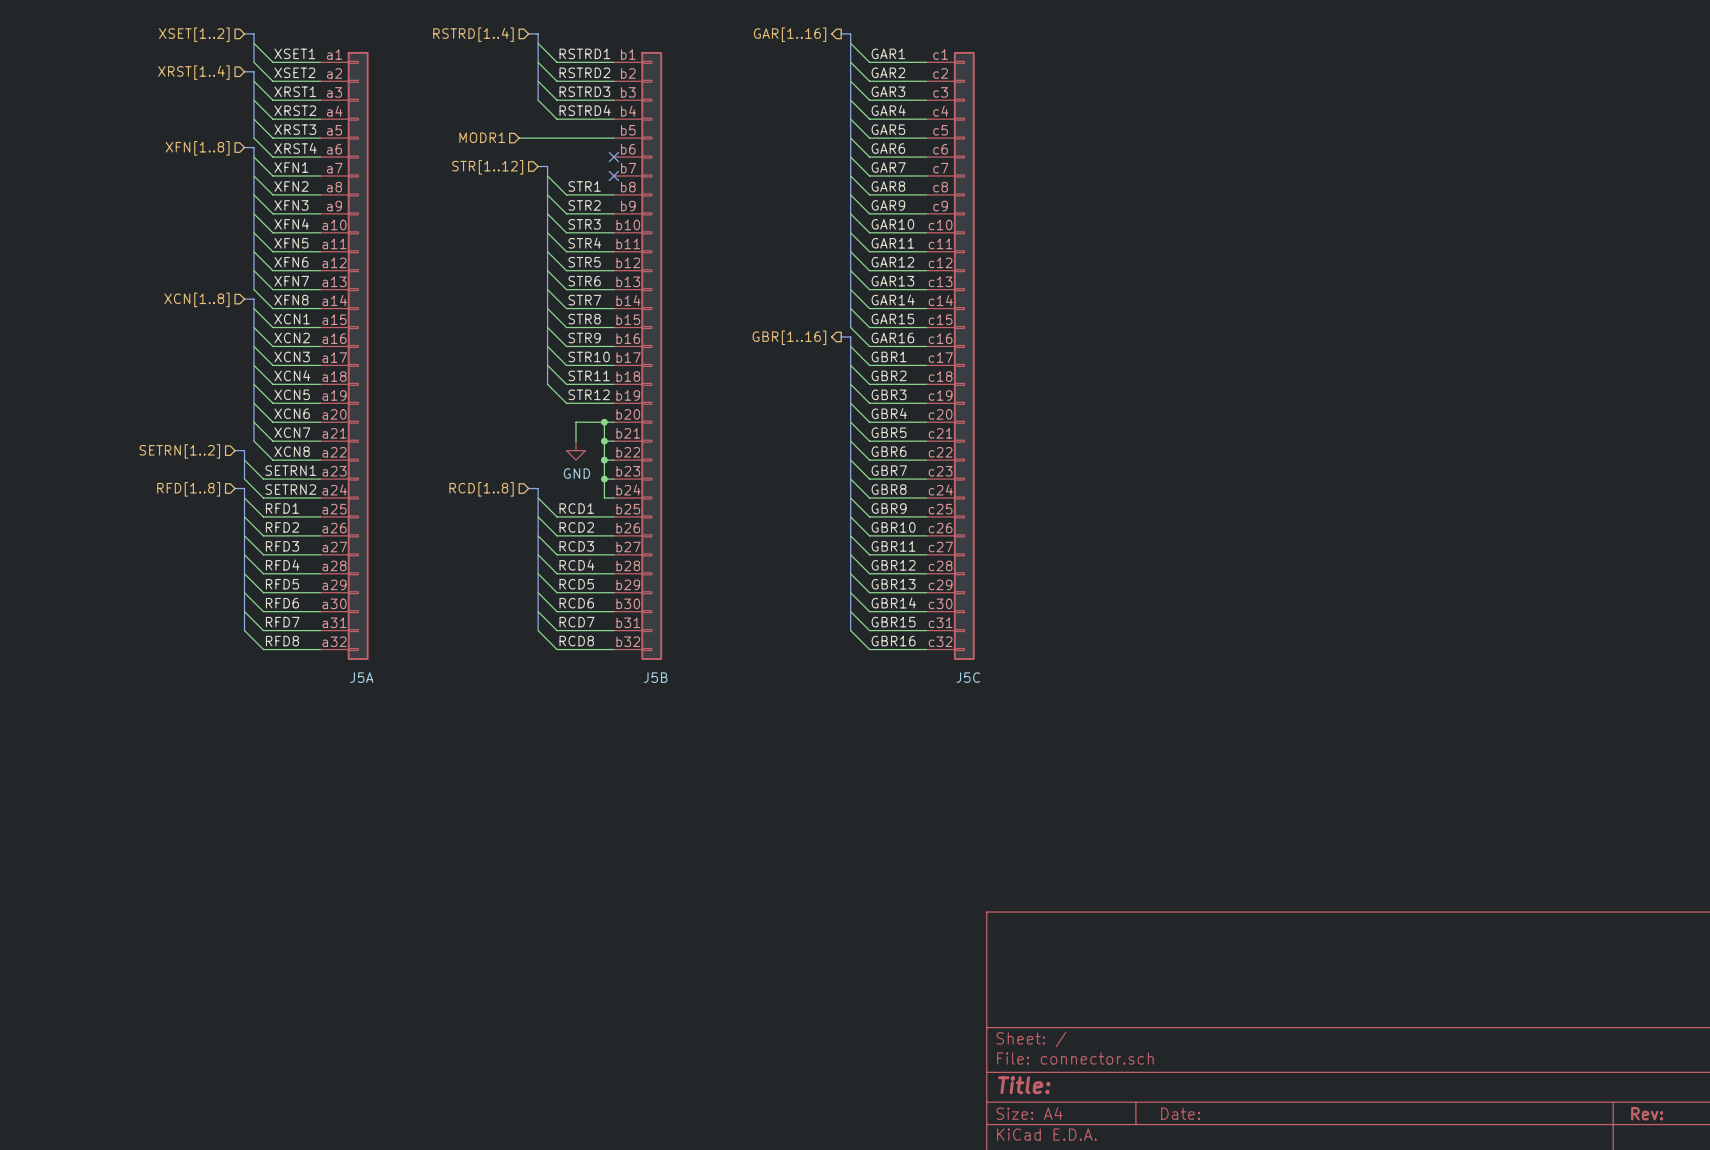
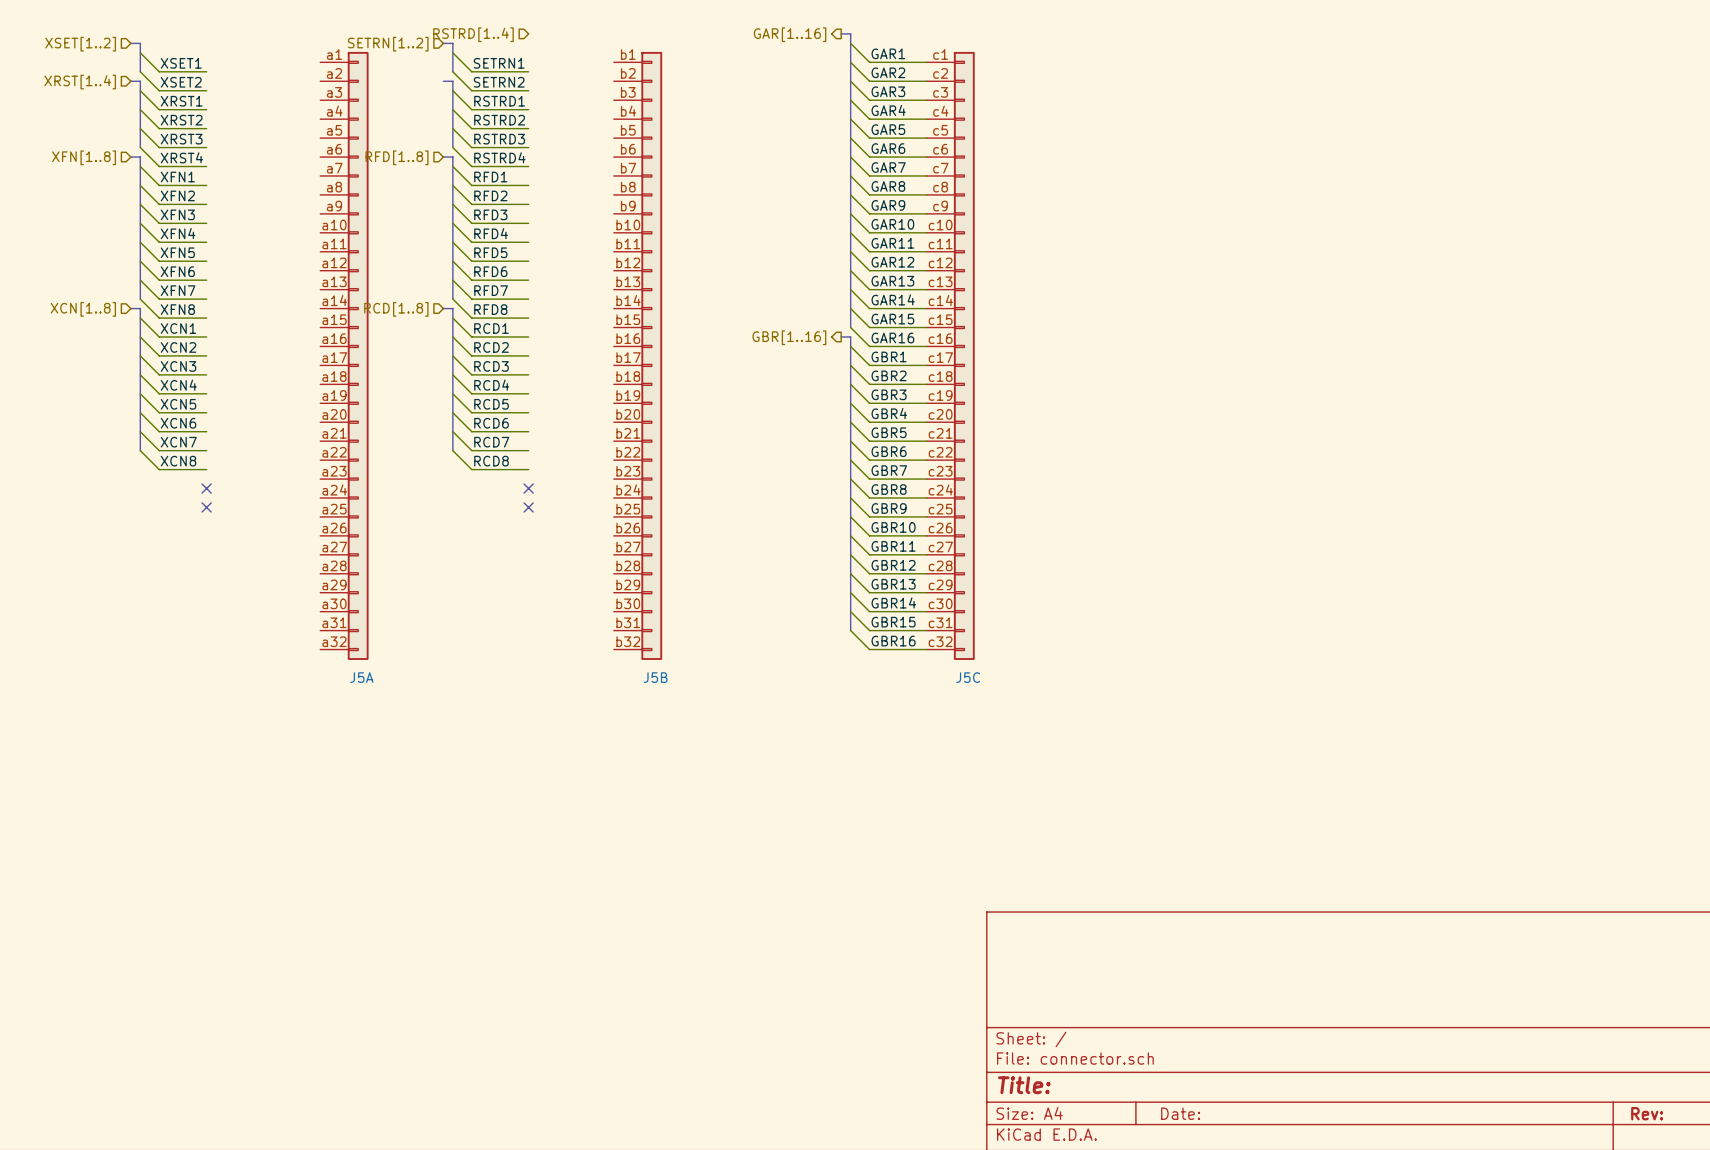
bus: (244, 33) (253, 33) (253, 62) -> (130, 43) (140, 43) (140, 71)
bus: (528, 33) (538, 33) (538, 100) -> (443, 81) (452, 81) (452, 147)
hierarchical label position: XSET[1..2] (194, 34) -> XSET[1..2] (80, 44)
wire: (253, 43) (272, 62) (320, 62) -> (140, 52) (159, 71) (206, 71)
bus: none -> (443, 43) (452, 43) (452, 71)
wire: (538, 43) (557, 62) (613, 62) -> (452, 52) (471, 71) (528, 71)
hierarchical label: none -> SETRN[1..2] (388, 44)
label position: XSET1 (294, 53) -> XSET1 (181, 63)
label position: RSTRD1 (584, 53) -> RSTRD1 (499, 101)
wire: (253, 62) (272, 81) (320, 81) -> (140, 71) (159, 90) (206, 90)
wire: (538, 62) (557, 81) (613, 81) -> (452, 71) (471, 90) (528, 90)
label: none -> SETRN1 (499, 63)
bus: (244, 71) (253, 71) (253, 138) -> (130, 81) (140, 81) (140, 147)
hierarchical label position: XRST[1..4] (193, 72) -> XRST[1..4] (80, 82)
label position: XSET2 (294, 72) -> XSET2 (181, 82)
label position: RSTRD2 (584, 72) -> RSTRD2 (499, 120)
wire: (253, 81) (272, 100) (320, 100) -> (140, 90) (159, 109) (206, 109)
wire: (538, 81) (557, 100) (613, 100) -> (452, 90) (471, 109) (528, 109)
label: none -> SETRN2 (499, 82)
label position: XRST1 (295, 91) -> XRST1 (181, 101)
label position: RSTRD3 (584, 91) -> RSTRD3 (499, 139)
wire: (253, 100) (272, 119) (320, 119) -> (140, 109) (159, 128) (206, 128)
wire: (538, 100) (557, 119) (613, 119) -> (452, 109) (471, 128) (528, 128)
label position: XRST2 (295, 110) -> XRST2 (181, 120)
label position: RSTRD4 (585, 110) -> RSTRD4 (499, 157)
wire: (253, 119) (272, 138) (320, 138) -> (140, 128) (159, 147) (206, 147)
wire: none -> (452, 128) (471, 147) (528, 147)
label position: XRST3 (295, 129) -> XRST3 (181, 139)
hierarchical label: MODR1 (482, 137) -> none
wire: (253, 138) (272, 157) (320, 157) -> (140, 147) (159, 166) (206, 166)
wire: (519, 138) (613, 138) -> none
bus: (244, 147) (253, 147) (253, 289) -> (130, 157) (140, 157) (140, 299)
wire: none -> (452, 147) (471, 166) (528, 166)
hierarchical label position: XFN[1..8] (197, 148) -> XFN[1..8] (84, 157)
label position: XRST4 (295, 148) -> XRST4 (181, 157)
wire: (253, 157) (272, 175) (320, 175) -> (140, 166) (159, 185) (206, 185)
bus: none -> (443, 157) (452, 157) (452, 299)
no-connect mark: (613, 157) -> none
wire: none -> (452, 166) (471, 185) (528, 185)
bus: (538, 166) (547, 166) (547, 384) -> none
label position: XFN1 (291, 167) -> XFN1 (177, 177)
hierarchical label: STR[1..12] (487, 167) -> RFD[1..8] (397, 157)
wire: (253, 175) (272, 194) (320, 194) -> (140, 185) (159, 204) (206, 204)
wire: (547, 175) (566, 194) (613, 194) -> none
no-connect mark: (613, 175) -> none
label: none -> RFD1 (490, 177)
wire: none -> (452, 185) (471, 204) (528, 204)
label position: XFN2 (291, 186) -> XFN2 (177, 195)
label: STR1 (584, 186) -> none
wire: (253, 194) (272, 213) (320, 213) -> (140, 204) (159, 223) (206, 223)
wire: (547, 194) (566, 213) (613, 213) -> none
label: none -> RFD2 (490, 195)
wire: none -> (452, 204) (471, 223) (528, 223)
label position: XFN3 (291, 205) -> XFN3 (177, 214)
label: STR2 (584, 205) -> none
wire: (253, 213) (272, 232) (320, 232) -> (140, 223) (159, 242) (206, 242)
wire: (547, 213) (566, 232) (613, 232) -> none
label: none -> RFD3 (490, 214)
wire: none -> (452, 223) (471, 242) (528, 242)
label position: XFN4 (291, 224) -> XFN4 (178, 233)
label: STR3 (584, 224) -> none
wire: (253, 232) (272, 251) (320, 251) -> (140, 242) (159, 261) (206, 261)
wire: (547, 232) (566, 251) (613, 251) -> none
label: none -> RFD4 (491, 233)
wire: none -> (452, 242) (471, 261) (528, 261)
label position: XFN5 (291, 243) -> XFN5 (177, 252)
label: STR4 (584, 243) -> none
wire: (253, 251) (272, 270) (320, 270) -> (140, 261) (159, 280) (206, 280)
wire: (547, 251) (566, 270) (613, 270) -> none
label: none -> RFD5 (490, 252)
wire: none -> (452, 261) (471, 280) (528, 280)
label position: XFN6 (291, 262) -> XFN6 (177, 271)
label: STR5 (584, 262) -> none
wire: (253, 270) (272, 289) (320, 289) -> (140, 280) (159, 299) (206, 299)
wire: (547, 270) (566, 289) (613, 289) -> none
label: none -> RFD6 (490, 271)
wire: none -> (452, 280) (471, 299) (528, 299)
label position: XFN7 (291, 281) -> XFN7 (178, 290)
label: STR6 (584, 281) -> none
wire: (253, 289) (272, 308) (320, 308) -> (140, 299) (159, 318) (206, 318)
wire: (547, 289) (566, 308) (613, 308) -> none
label: none -> RFD7 (491, 290)
hierarchical label position: XCN[1..8] (197, 299) -> XCN[1..8] (83, 309)
bus: (244, 299) (253, 299) (253, 441) -> (130, 308) (140, 308) (140, 450)
wire: none -> (452, 299) (471, 318) (528, 318)
label position: XFN8 (291, 300) -> XFN8 (177, 309)
label: STR7 (584, 300) -> none
wire: (253, 308) (272, 327) (320, 327) -> (140, 318) (159, 336) (206, 336)
bus: none -> (443, 308) (452, 308) (452, 450)
wire: (547, 308) (566, 327) (613, 327) -> none
hierarchical label: none -> RCD[1..8] (396, 309)
label: none -> RFD8 (490, 309)
wire: none -> (452, 318) (471, 336) (528, 336)
label position: XCN1 (292, 319) -> XCN1 (178, 328)
label: STR8 (584, 319) -> none
wire: (253, 327) (272, 346) (320, 346) -> (140, 336) (159, 355) (206, 355)
wire: (547, 327) (566, 346) (613, 346) -> none
label: none -> RCD1 (491, 328)
label position: XCN2 (292, 338) -> XCN2 (178, 347)
label: STR9 (584, 338) -> none
wire: (253, 346) (272, 365) (320, 365) -> (140, 355) (159, 374) (206, 374)
wire: (547, 346) (566, 365) (613, 365) -> none
label: none -> RCD2 (491, 347)
label position: XCN3 (292, 356) -> XCN3 (178, 366)
label: STR10 (589, 356) -> none
wire: (253, 365) (272, 384) (320, 384) -> (140, 374) (159, 393) (206, 393)
wire: (547, 365) (566, 384) (613, 384) -> none
label: none -> RCD3 (491, 366)
label position: XCN4 (292, 375) -> XCN4 (178, 385)
label: STR11 (589, 375) -> none
wire: (253, 384) (272, 403) (320, 403) -> (140, 393) (159, 412) (206, 412)
wire: (547, 384) (566, 403) (613, 403) -> none
label: none -> RCD4 (491, 385)
label position: XCN5 (292, 394) -> XCN5 (178, 404)
label: STR12 (589, 394) -> none
wire: (253, 403) (272, 422) (320, 422) -> (140, 412) (159, 431) (206, 431)
label: none -> RCD5 (491, 404)
label position: XCN6 (292, 413) -> XCN6 (178, 423)
wire: (253, 422) (272, 441) (320, 441) -> (140, 431) (159, 450) (206, 450)
wire: (604, 422) (604, 498) (613, 498) -> none
junction: (604, 422) -> none
wire: (613, 422) (575, 422) (575, 441) -> none
label: none -> RCD6 (491, 423)
label position: XCN7 (292, 432) -> XCN7 (178, 442)
wire: (253, 441) (272, 460) (320, 460) -> (140, 450) (159, 469) (206, 469)
wire: (604, 441) (613, 441) -> none
junction: (604, 441) -> none
label: none -> RCD7 (491, 442)
bus: (235, 450) (244, 450) (244, 479) -> none
power symbol: GND (575, 450) -> none
hierarchical label: SETRN[1..2] (179, 451) -> none
label position: XCN8 (292, 451) -> XCN8 (178, 461)
wire: (244, 460) (263, 479) (320, 479) -> none
wire: (604, 460) (613, 460) -> none
junction: (604, 460) -> none
label: none -> RCD8 (491, 461)
label: SETRN1 (290, 470) -> none
wire: (244, 479) (263, 498) (320, 498) -> none
wire: (604, 479) (613, 479) -> none
junction: (604, 479) -> none
no-connect mark: none -> (206, 488)
bus: (235, 488) (244, 488) (244, 630) -> none
bus: (528, 488) (538, 488) (538, 630) -> none
no-connect mark: none -> (528, 488)
hierarchical label: RFD[1..8] (188, 489) -> none
label: SETRN2 (290, 489) -> none
hierarchical label: RCD[1..8] (481, 489) -> none
wire: (244, 498) (263, 516) (320, 516) -> none
wire: (538, 498) (557, 516) (613, 516) -> (452, 336) (471, 355) (528, 355)
no-connect mark: none -> (206, 507)
no-connect mark: none -> (528, 507)
label: RFD1 (282, 508) -> none
label: RCD1 (576, 508) -> none
wire: (244, 516) (263, 535) (320, 535) -> none
wire: (538, 516) (557, 535) (613, 535) -> (452, 355) (471, 374) (528, 374)
label: RFD2 (282, 527) -> none
label: RCD2 (576, 527) -> none
wire: (244, 535) (263, 554) (320, 554) -> none
wire: (538, 535) (557, 554) (613, 554) -> (452, 374) (471, 393) (528, 393)
label: RFD3 (282, 546) -> none
label: RCD3 (576, 546) -> none
wire: (244, 554) (263, 573) (320, 573) -> none
wire: (538, 554) (557, 573) (613, 573) -> (452, 393) (471, 412) (528, 412)
label: RFD4 (282, 565) -> none
label: RCD4 (576, 565) -> none
wire: (244, 573) (263, 592) (320, 592) -> none
wire: (538, 573) (557, 592) (613, 592) -> (452, 412) (471, 431) (528, 431)
label: RFD5 (282, 584) -> none
label: RCD5 (576, 584) -> none
wire: (244, 592) (263, 611) (320, 611) -> none
wire: (538, 592) (557, 611) (613, 611) -> (452, 431) (471, 450) (528, 450)
label: RFD6 (282, 603) -> none
label: RCD6 (576, 603) -> none
wire: (244, 611) (263, 630) (320, 630) -> none
wire: (538, 611) (557, 630) (613, 630) -> (452, 450) (471, 469) (528, 469)
label: RFD7 (282, 622) -> none
label: RCD7 (576, 622) -> none
wire: (244, 630) (263, 649) (320, 649) -> none
wire: (538, 630) (557, 649) (613, 649) -> none
label: RFD8 (282, 641) -> none
label: RCD8 (576, 641) -> none

